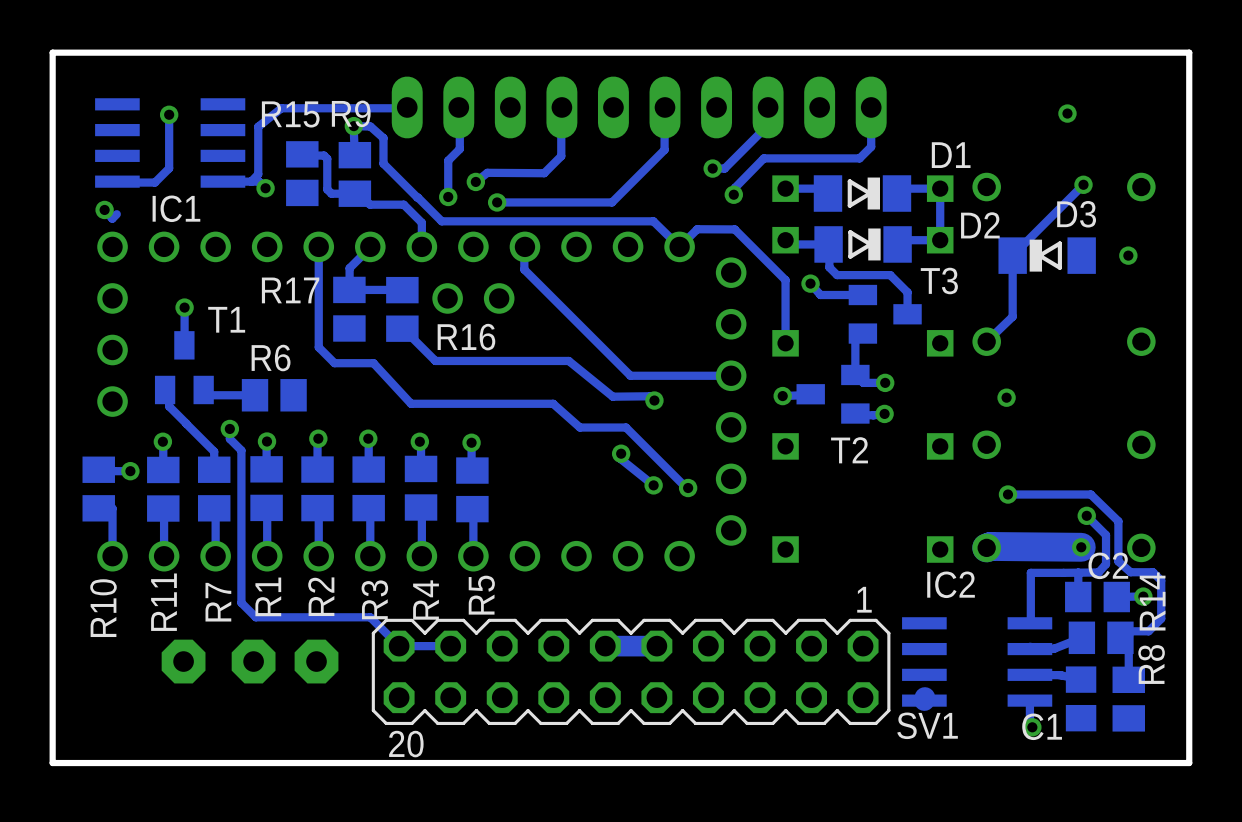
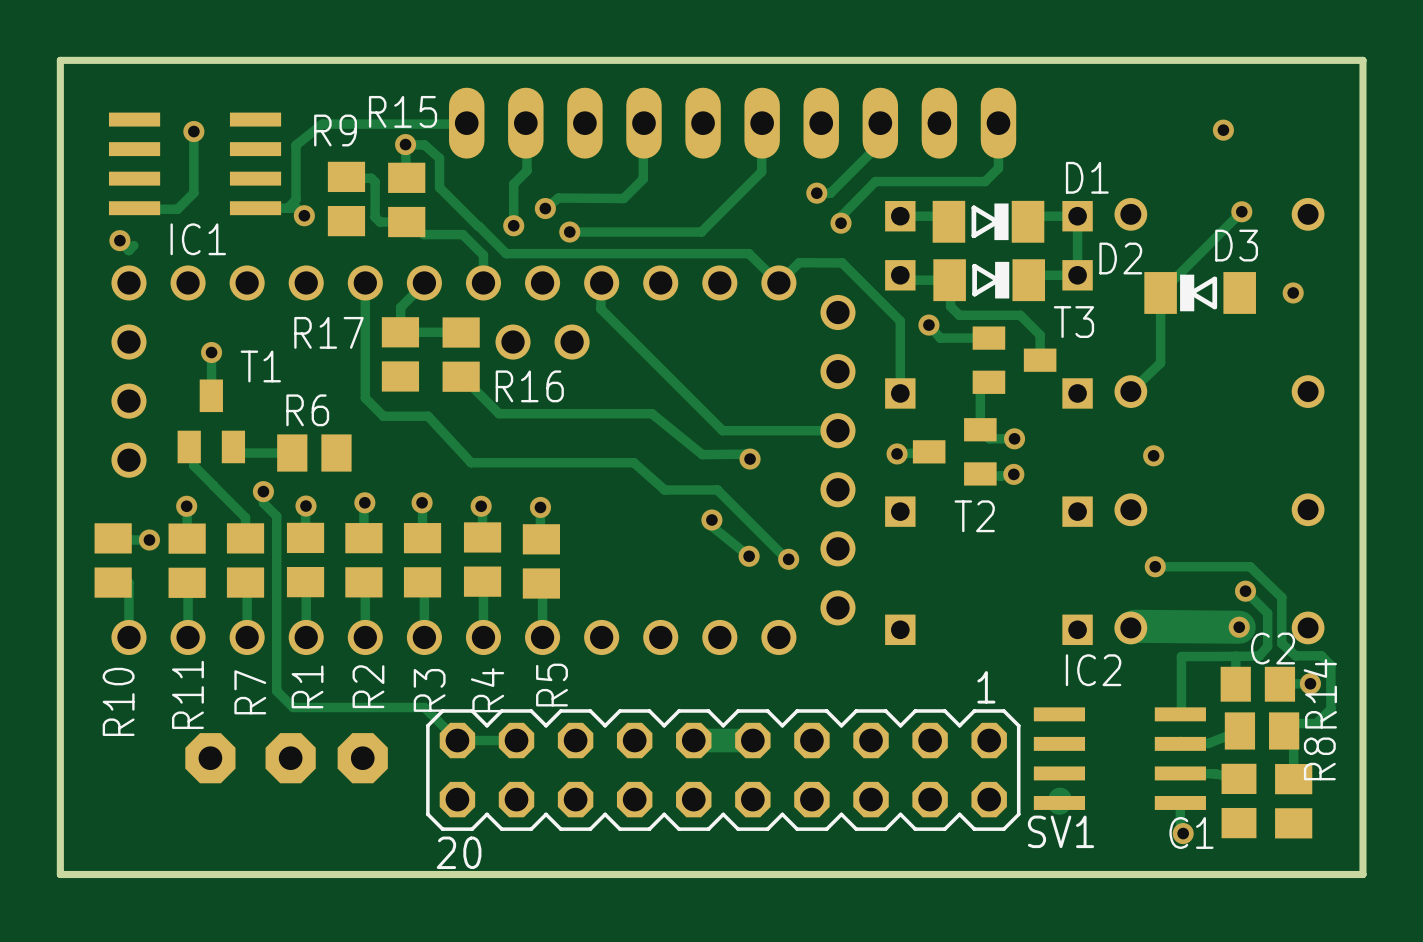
R9 name position: R9 (351, 113) -> R9 (335, 130)
R15 name position: R15 (290, 114) -> R15 (403, 111)

